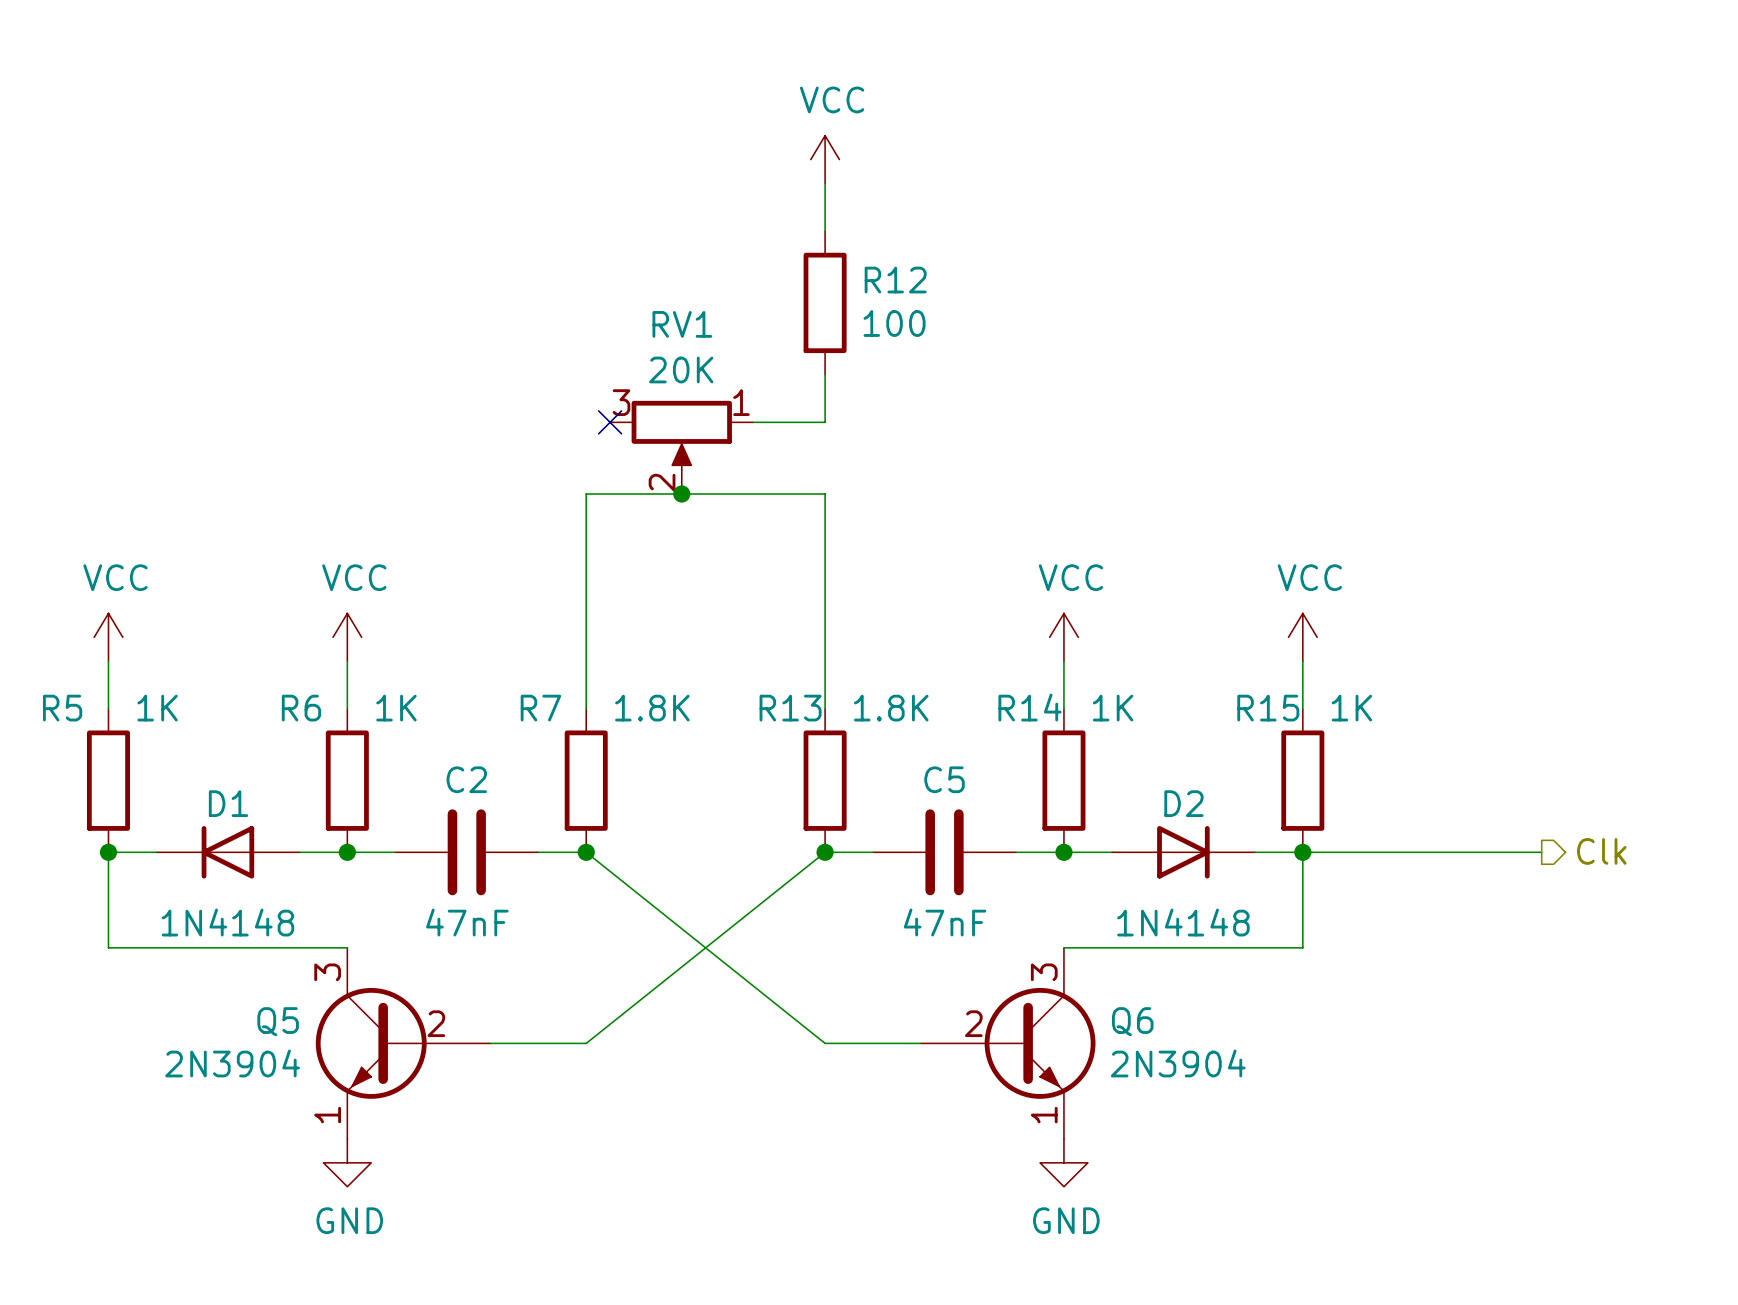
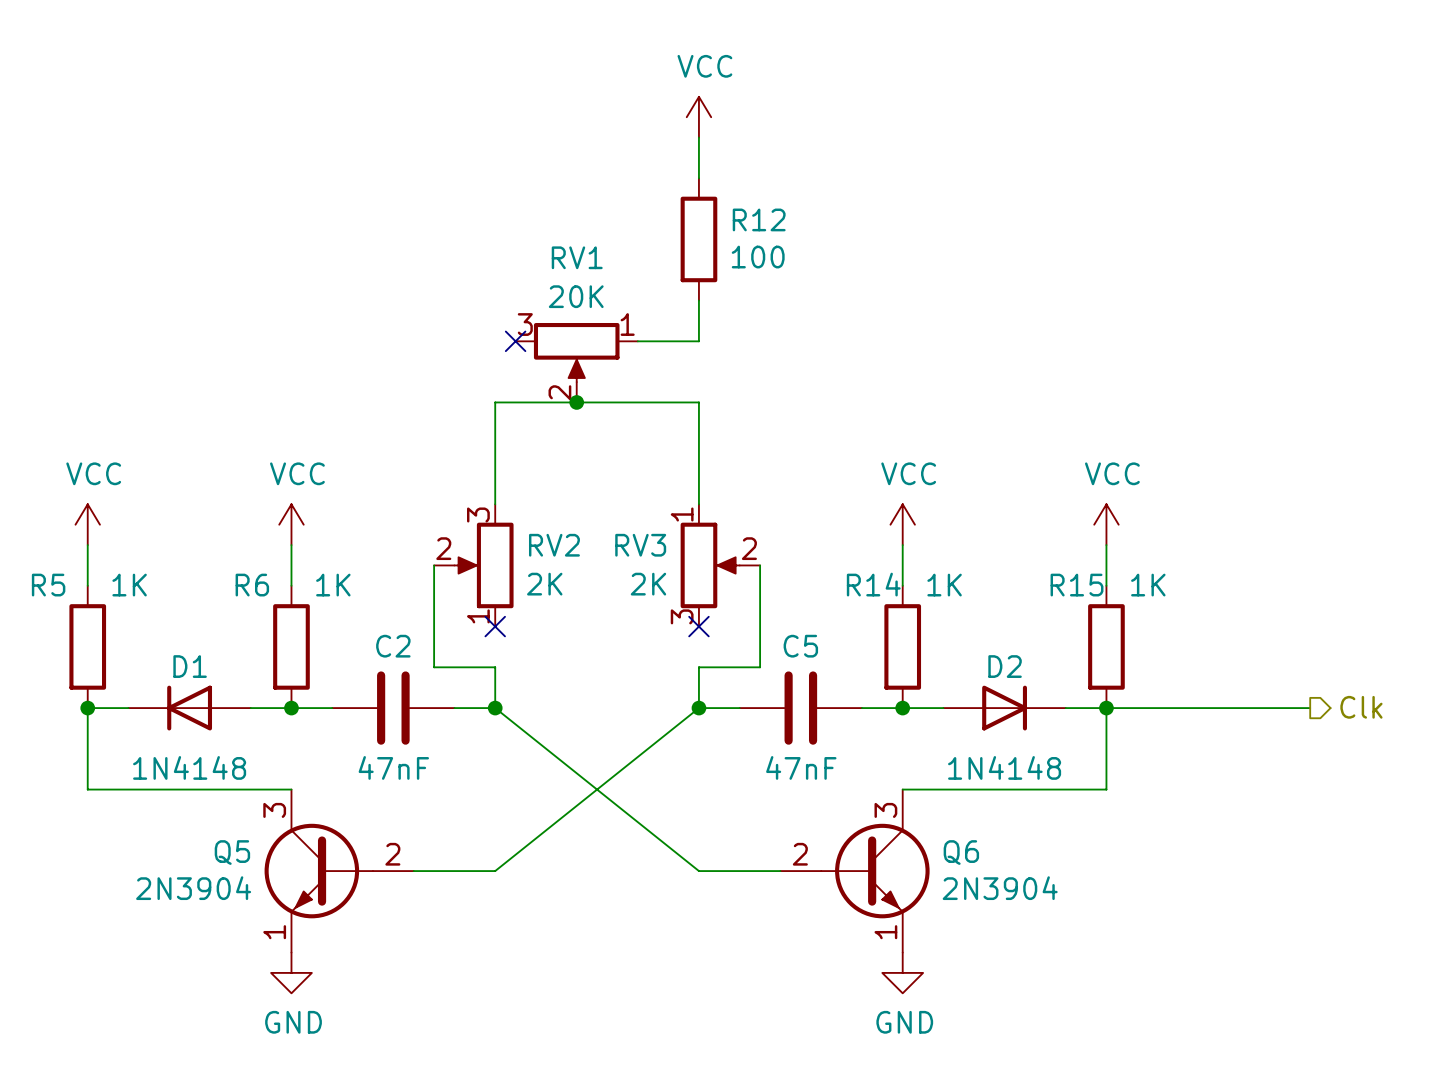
wire: (586, 613) (586, 708) -> none
wire: (825, 613) (825, 708) -> none
wire: none -> (434, 565) (434, 667) (495, 667) (495, 708)
RV2: none -> 2K (473, 565)
RV3: none -> 2K (720, 565)
wire: none -> (760, 565) (760, 667) (698, 667) (698, 708)
no-connect mark: none -> (495, 626)
no-connect mark: none -> (698, 626)
R7: 1.8K (586, 780) -> none
R13: 1.8K (825, 780) -> none
Q5 symbol: [315, 947, 491, 1139] -> [264, 789, 414, 953]
Q6 symbol: [920, 947, 1096, 1139] -> [780, 789, 930, 953]

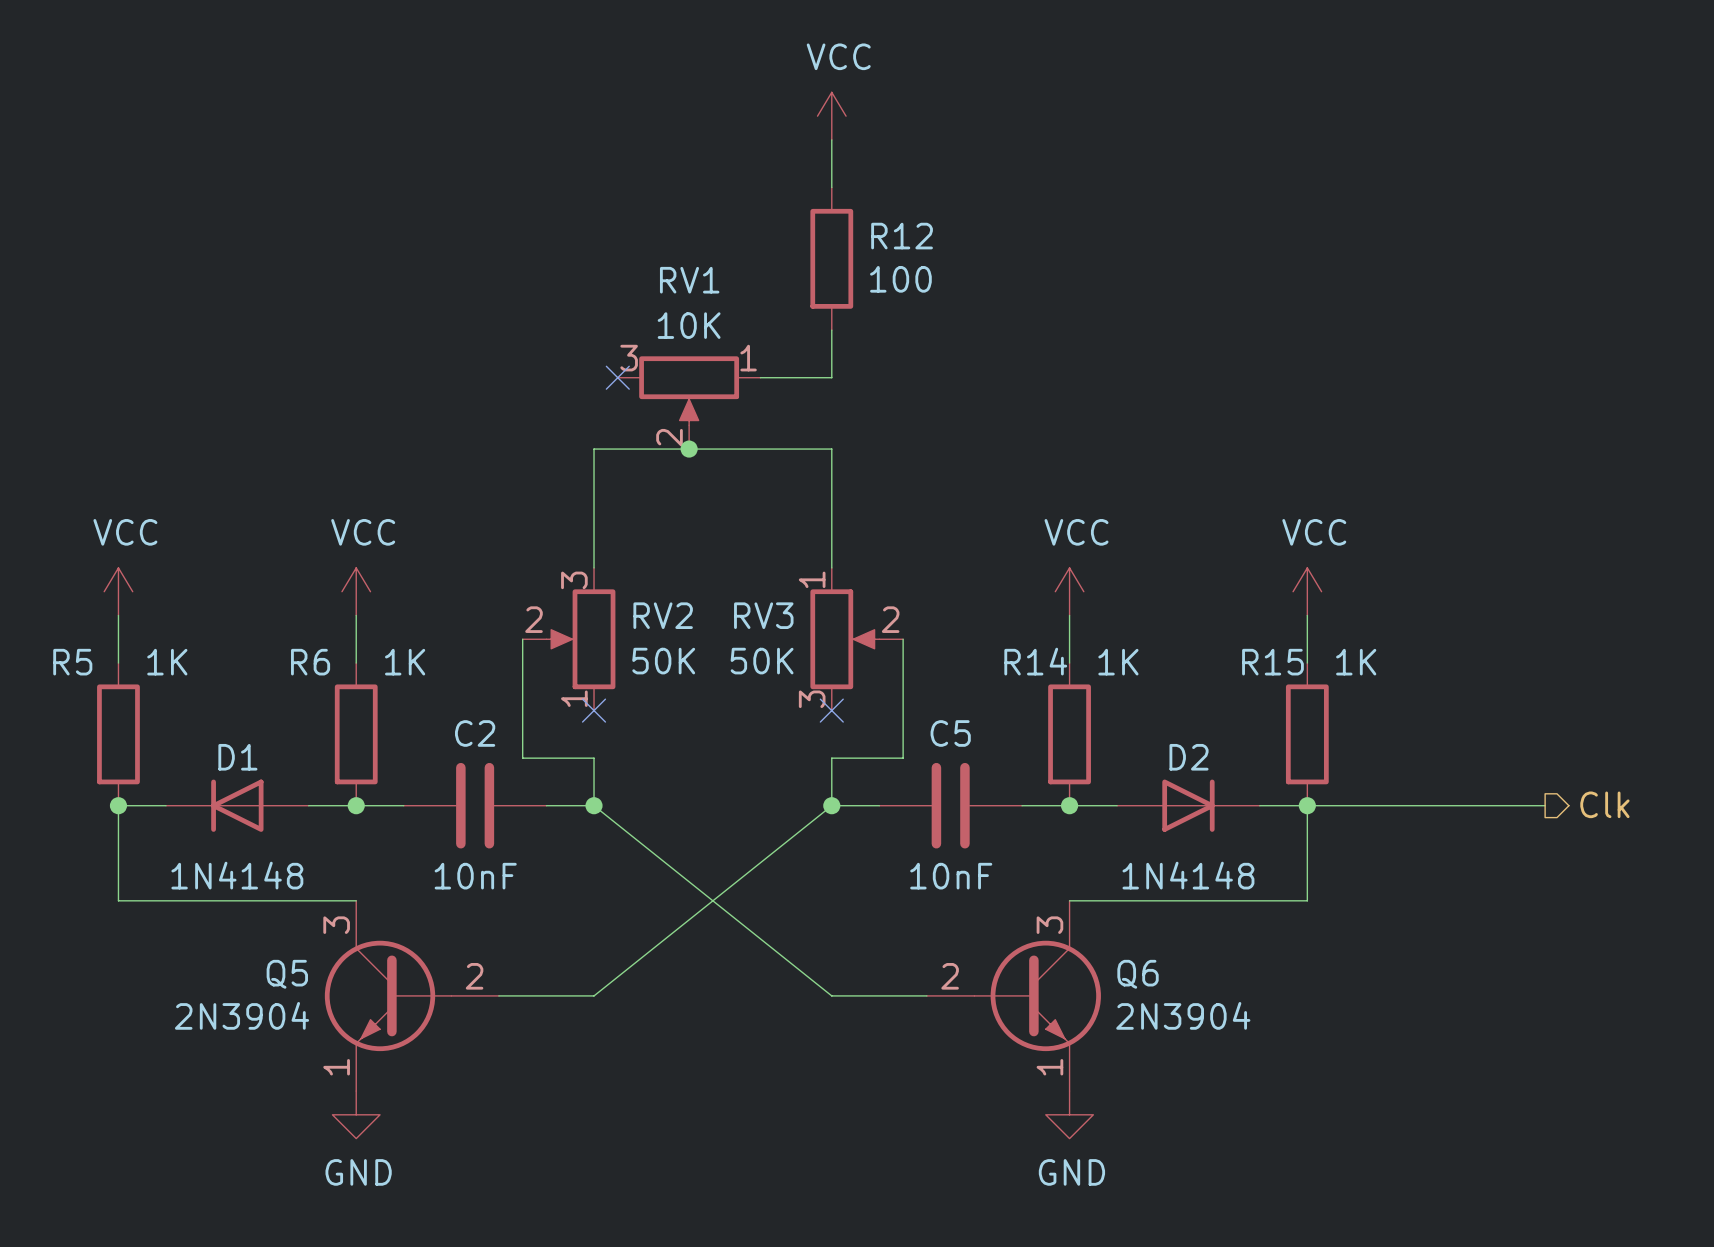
RV1 value: 20K (576, 296) -> 10K (689, 325)
RV2 value: 2K (544, 584) -> 50K (663, 661)
RV3 value: 2K (648, 584) -> 50K (762, 661)
C2 value: 47nF (393, 767) -> 10nF (475, 876)
C5 value: 47nF (801, 767) -> 10nF (951, 876)

